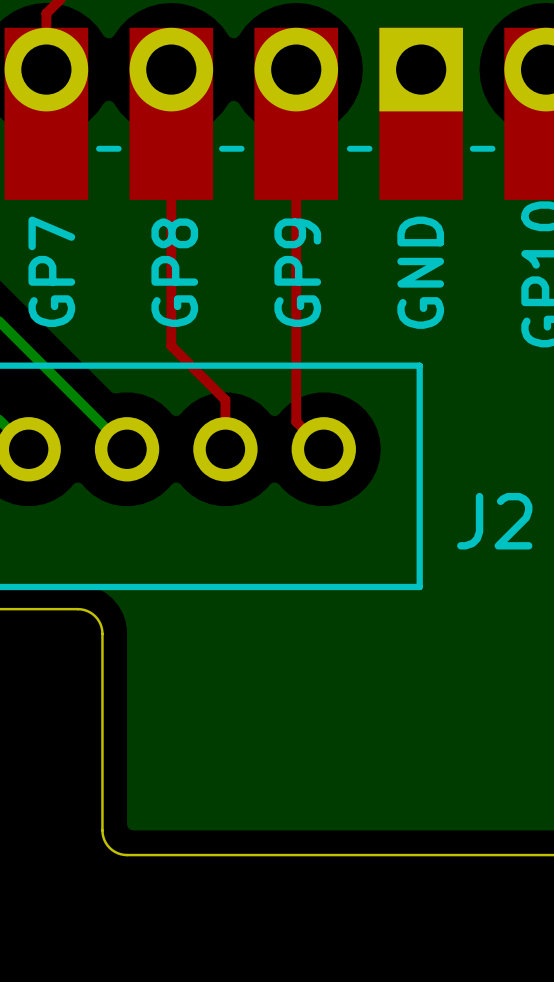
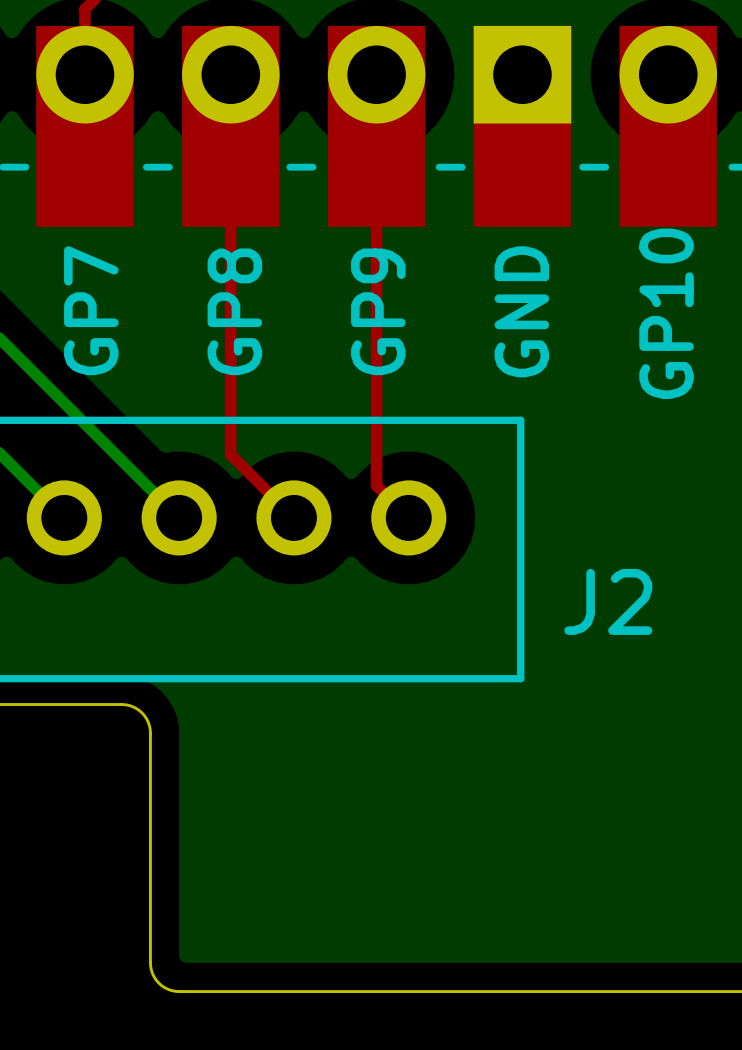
top track: (171, 346) (225, 400) (225, 449) -> (230, 397) (230, 454) (293, 517)

